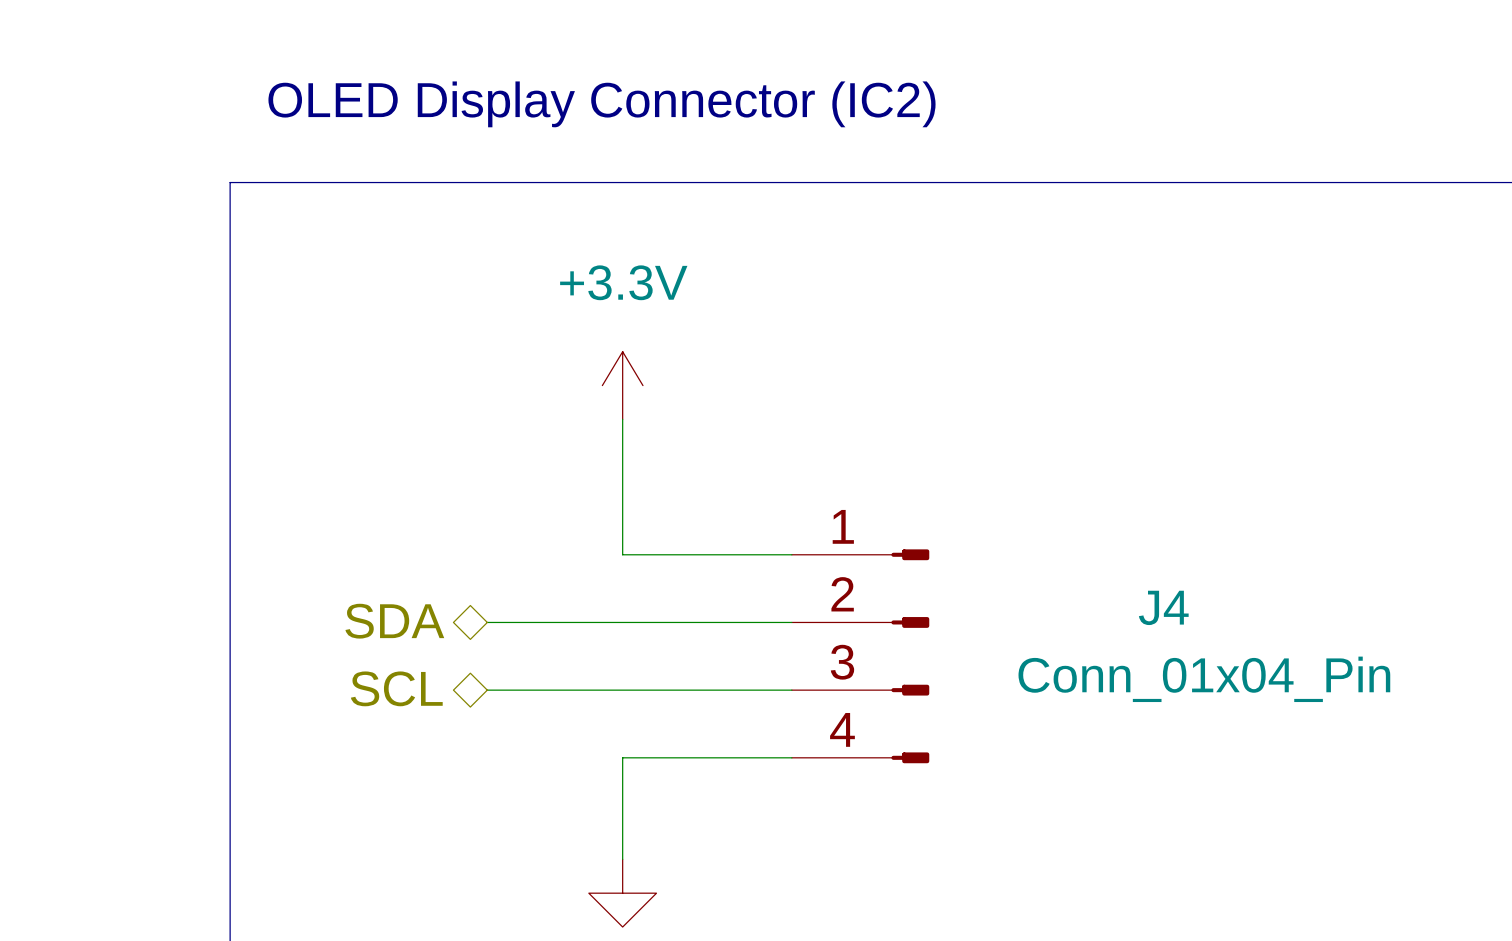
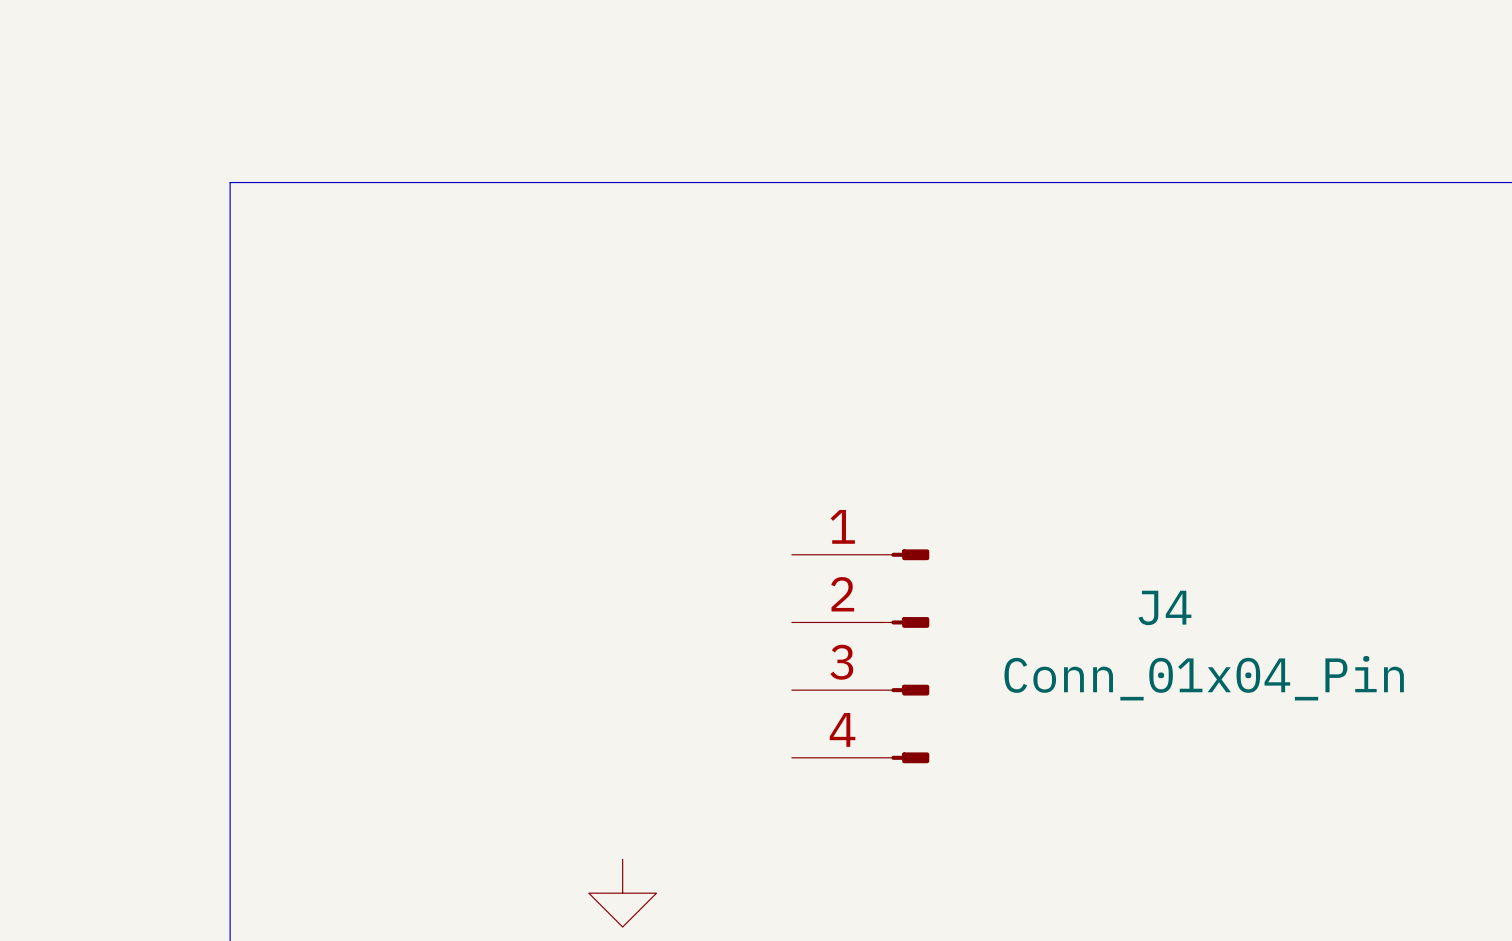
text: OLED Display Connector (IC2) (602, 104) -> none
power symbol: +3.3V (622, 385) -> none
wire: (622, 419) (622, 554) (791, 554) -> none
hierarchical label: SDA (394, 621) -> none
wire: (487, 622) (791, 622) -> none
hierarchical label: SCL (396, 688) -> none
wire: (487, 690) (791, 690) -> none
wire: (791, 757) (622, 757) (622, 859) -> none

